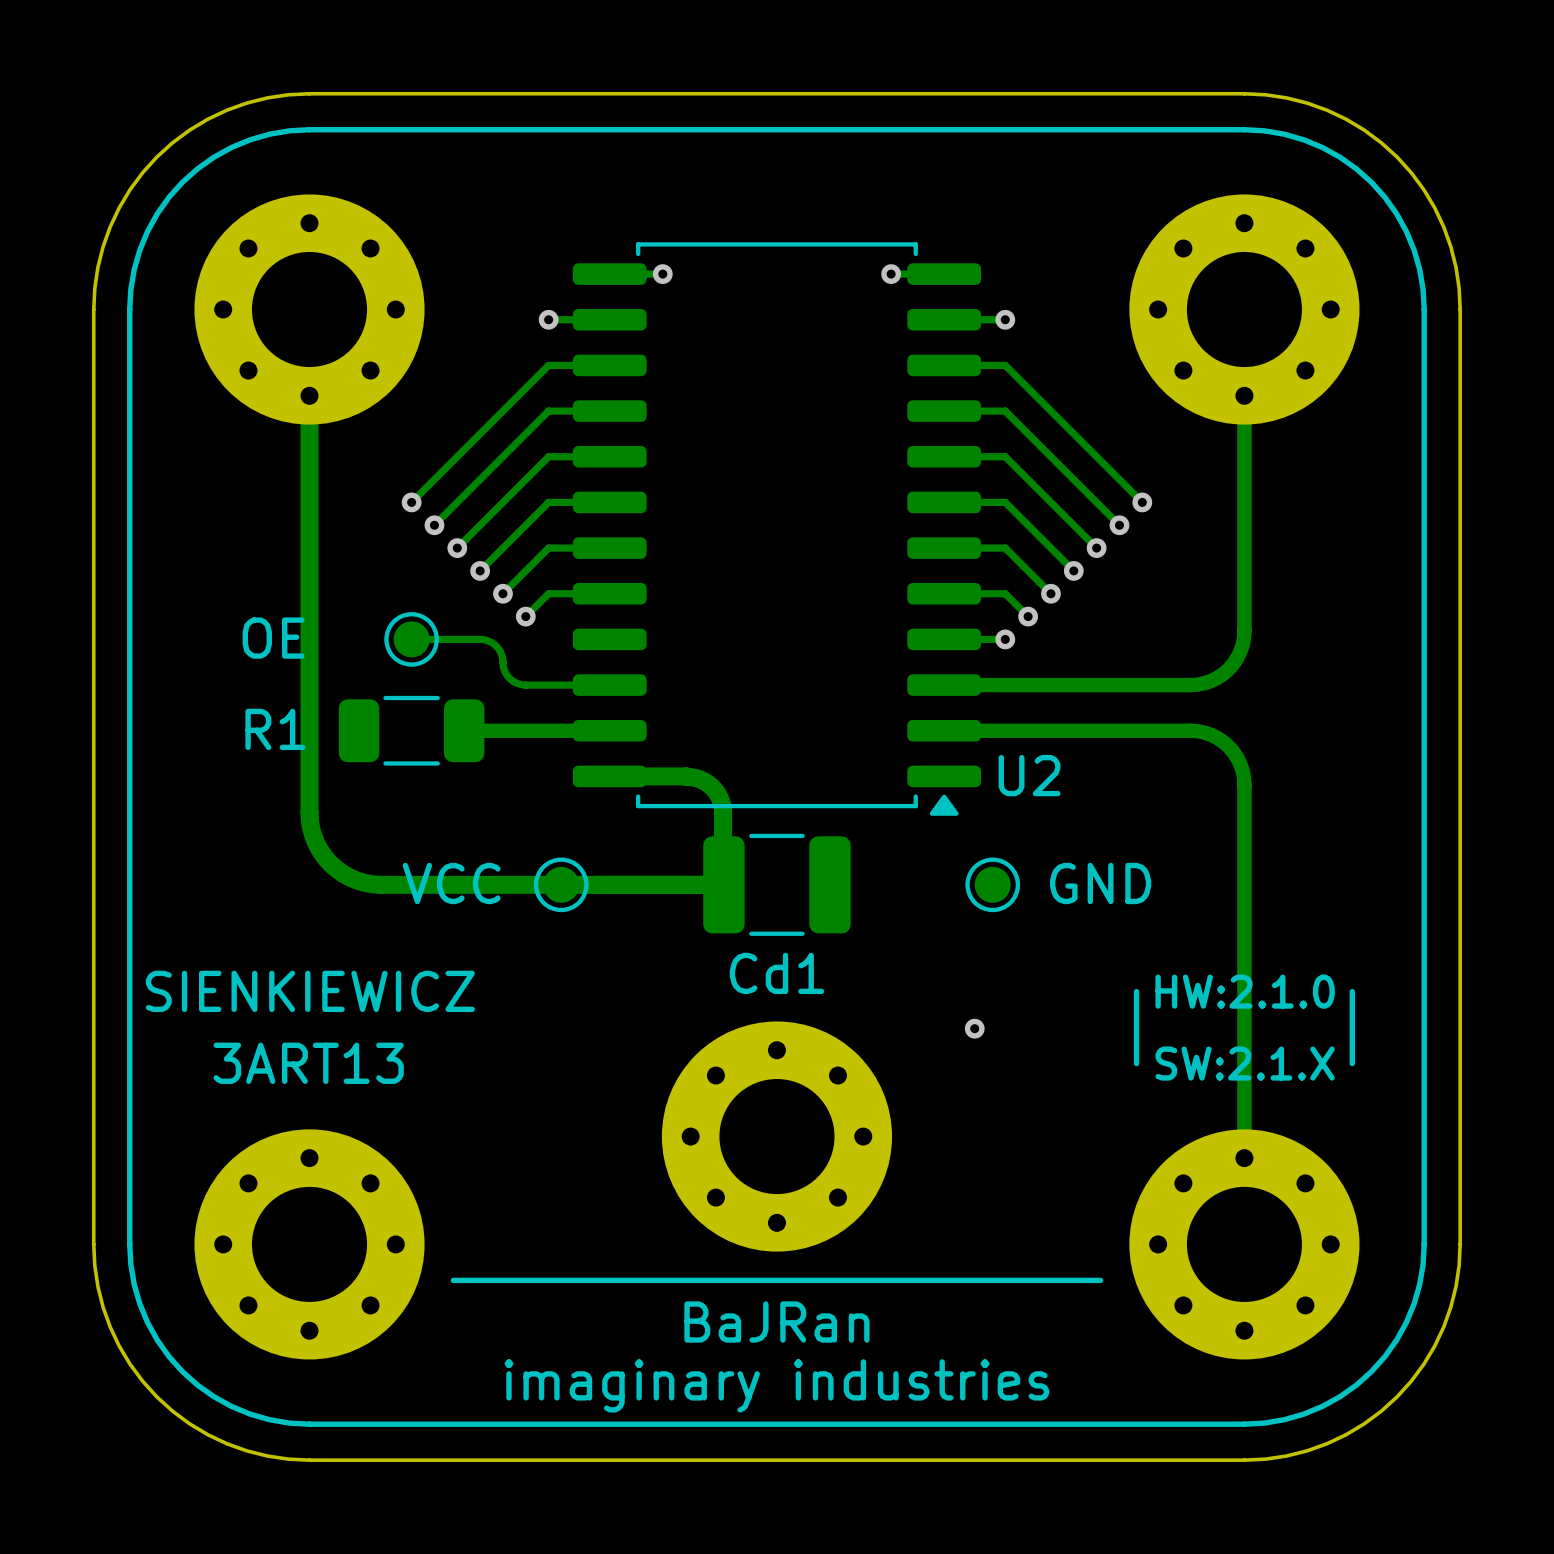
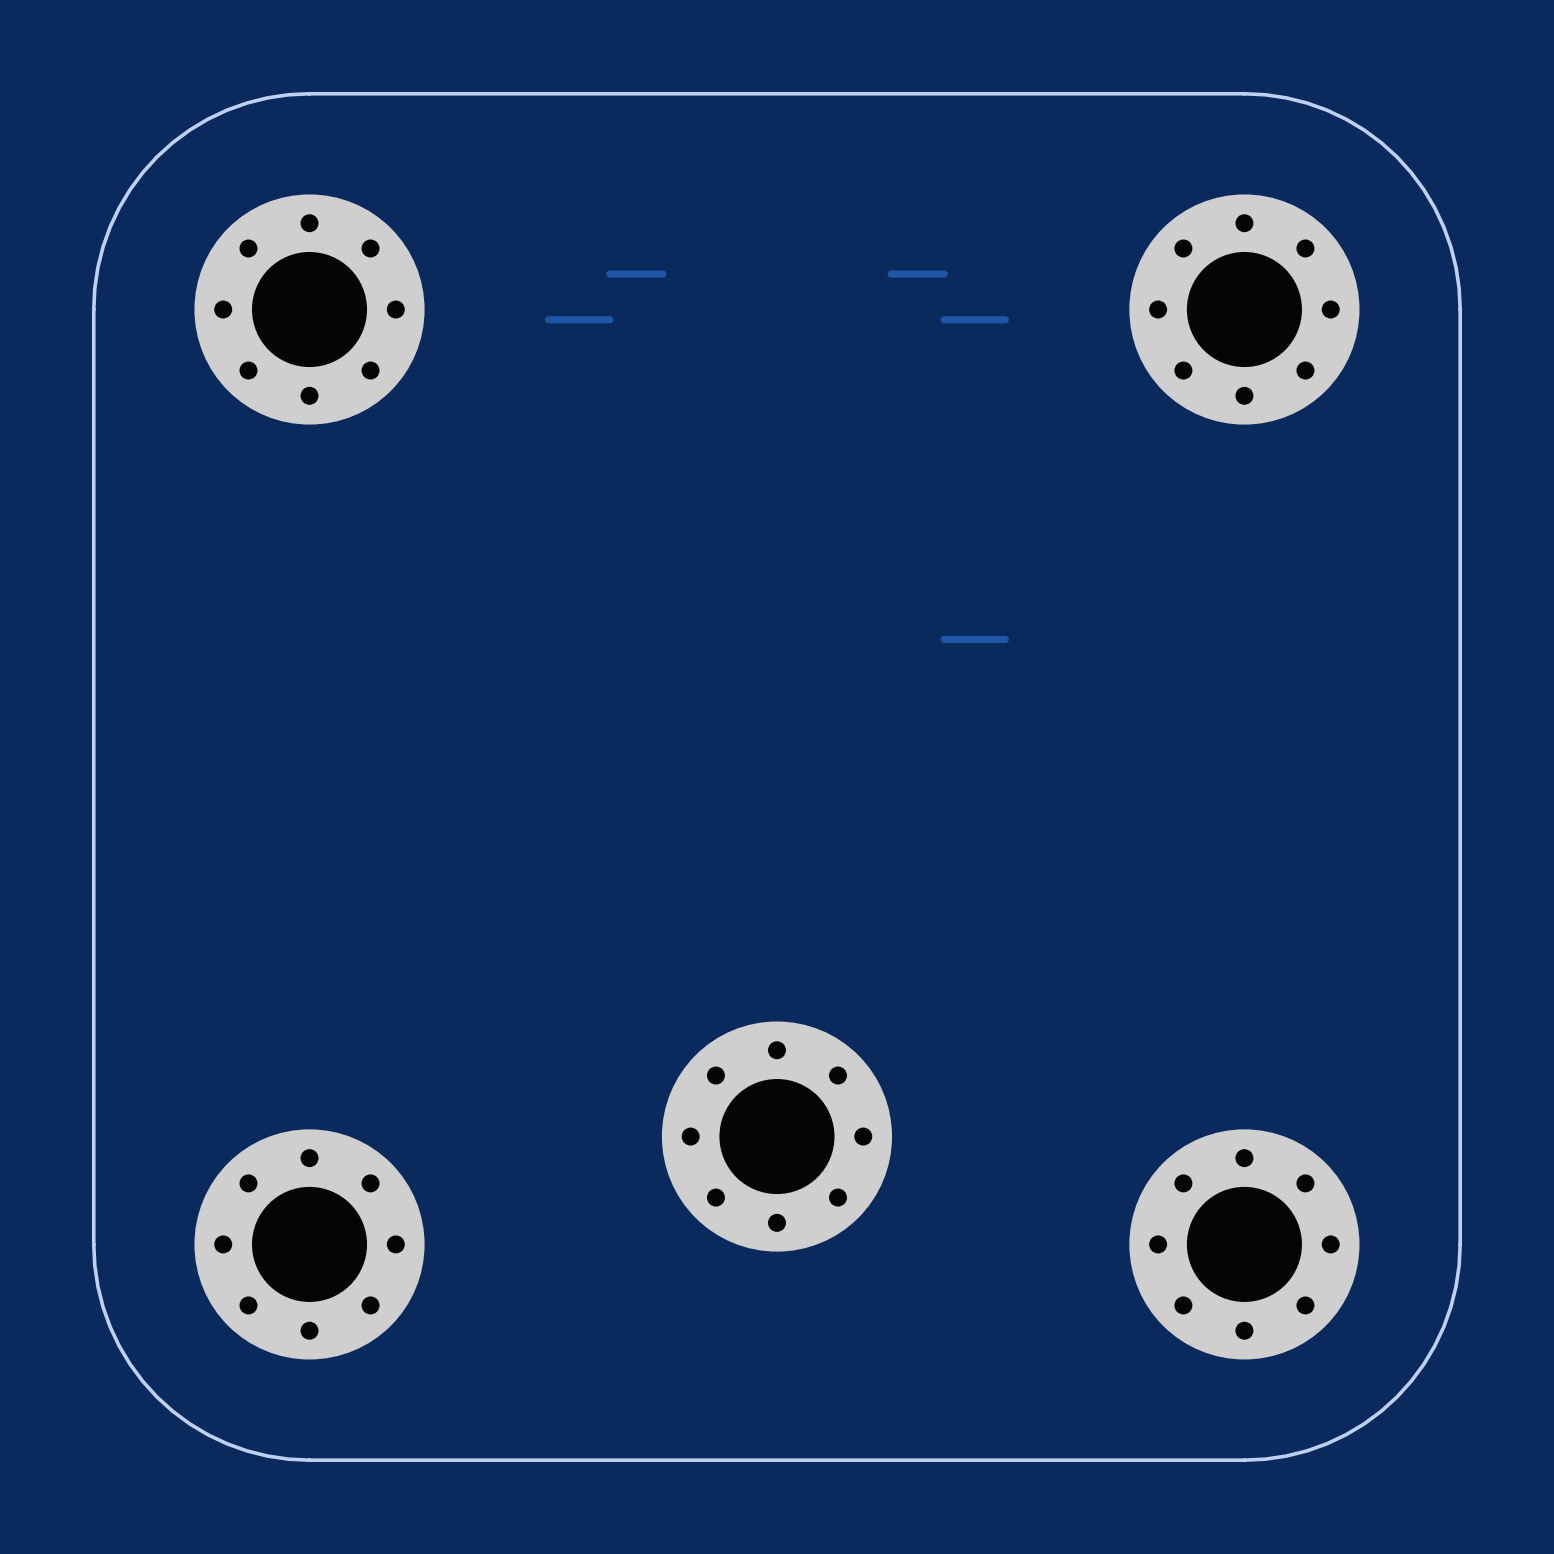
line: (1244, 129) (289, 130) (250, 139) (231, 147) (197, 168) (168, 197) (147, 231) (139, 250) (130, 289) (129, 309) (129, 1244) (134, 1284) (147, 1322) (168, 1356) (197, 1384) (231, 1406) (250, 1414) (269, 1419) (309, 1424) (1244, 1424) (1284, 1419) (1322, 1406) (1356, 1384) (1384, 1356) (1406, 1322) (1414, 1303) (1423, 1264) (1424, 1244) (1423, 289) (1414, 250) (1396, 213) (1384, 197) (1356, 168) (1340, 157) (1303, 139) (1264, 130) (1244, 129) -> none
via: (662, 274) -> none
via: (891, 274) -> none
track: (309, 309) (309, 812) (313, 836) (320, 851) (330, 863) (343, 873) (357, 880) (373, 884) (723, 884) (722, 808) (719, 797) (712, 787) (702, 780) (686, 776) (609, 776) -> none
track: (1244, 309) (1244, 631) (1242, 645) (1233, 663) (1217, 677) (1197, 684) (944, 685) -> none
via: (548, 319) -> none
via: (1005, 319) -> none
track: (609, 365) (548, 365) (411, 502) -> none
track: (944, 365) (1005, 365) (1142, 502) -> none
track: (609, 411) (548, 411) (434, 525) -> none
track: (944, 411) (1005, 411) (1119, 525) -> none
track: (609, 456) (548, 456) (457, 548) -> none
track: (944, 456) (1005, 456) (1096, 548) -> none
via: (411, 502) -> none
track: (609, 502) (548, 502) (480, 570) -> none
track: (944, 502) (1005, 502) (1073, 570) -> none
via: (1142, 502) -> none
via: (434, 525) -> none
via: (1119, 525) -> none
U2: (776, 529) -> none
via: (457, 548) -> none
track: (609, 548) (548, 548) (502, 593) -> none
track: (944, 548) (1005, 548) (1050, 593) -> none
via: (1096, 548) -> none
via: (480, 570) -> none
via: (1073, 570) -> none
via: (502, 593) -> none
track: (609, 593) (548, 593) (525, 616) -> none
track: (944, 593) (1005, 593) (1028, 616) -> none
via: (1050, 593) -> none
via: (525, 616) -> none
via: (1028, 616) -> none
track: (411, 639) (487, 640) (499, 650) (507, 676) (520, 684) (609, 685) -> none
OE: (411, 639) -> none
via: (1005, 639) -> none
R1: (411, 730) -> none
track: (609, 730) (464, 730) -> none
track: (944, 730) (1197, 731) (1211, 734) (1223, 741) (1237, 757) (1242, 770) (1244, 784) (1244, 1244) -> none
VCC: (561, 884) -> none
Cd1: (776, 884) -> none
GND: (992, 884) -> none
text: SIENKIEWICZ (310, 991) -> none
line: (1136, 991) (1136, 1063) -> none
text: HW:2.1.0 (1245, 991) -> none
line: (1352, 991) (1352, 1063) -> none
via: (974, 1028) -> none
text: 3ART13 (308, 1063) -> none
text: SW:2.1.X (1245, 1063) -> none
line: (1100, 1280) (453, 1280) -> none
text: BaJRan (776, 1322) -> none
text: imaginary industries (776, 1385) -> none

